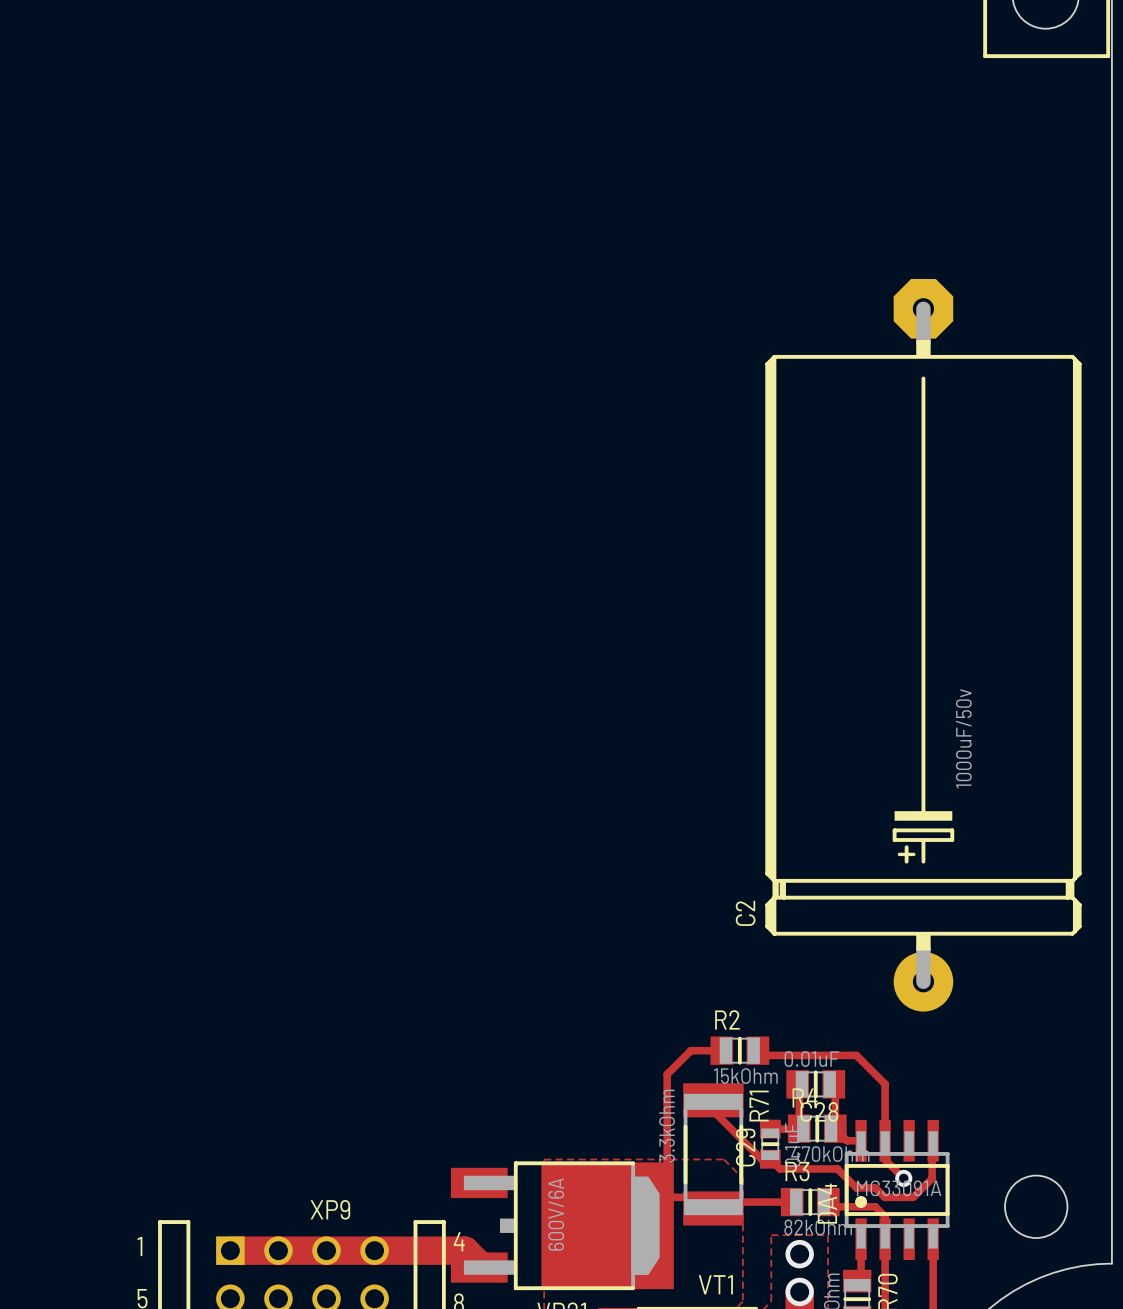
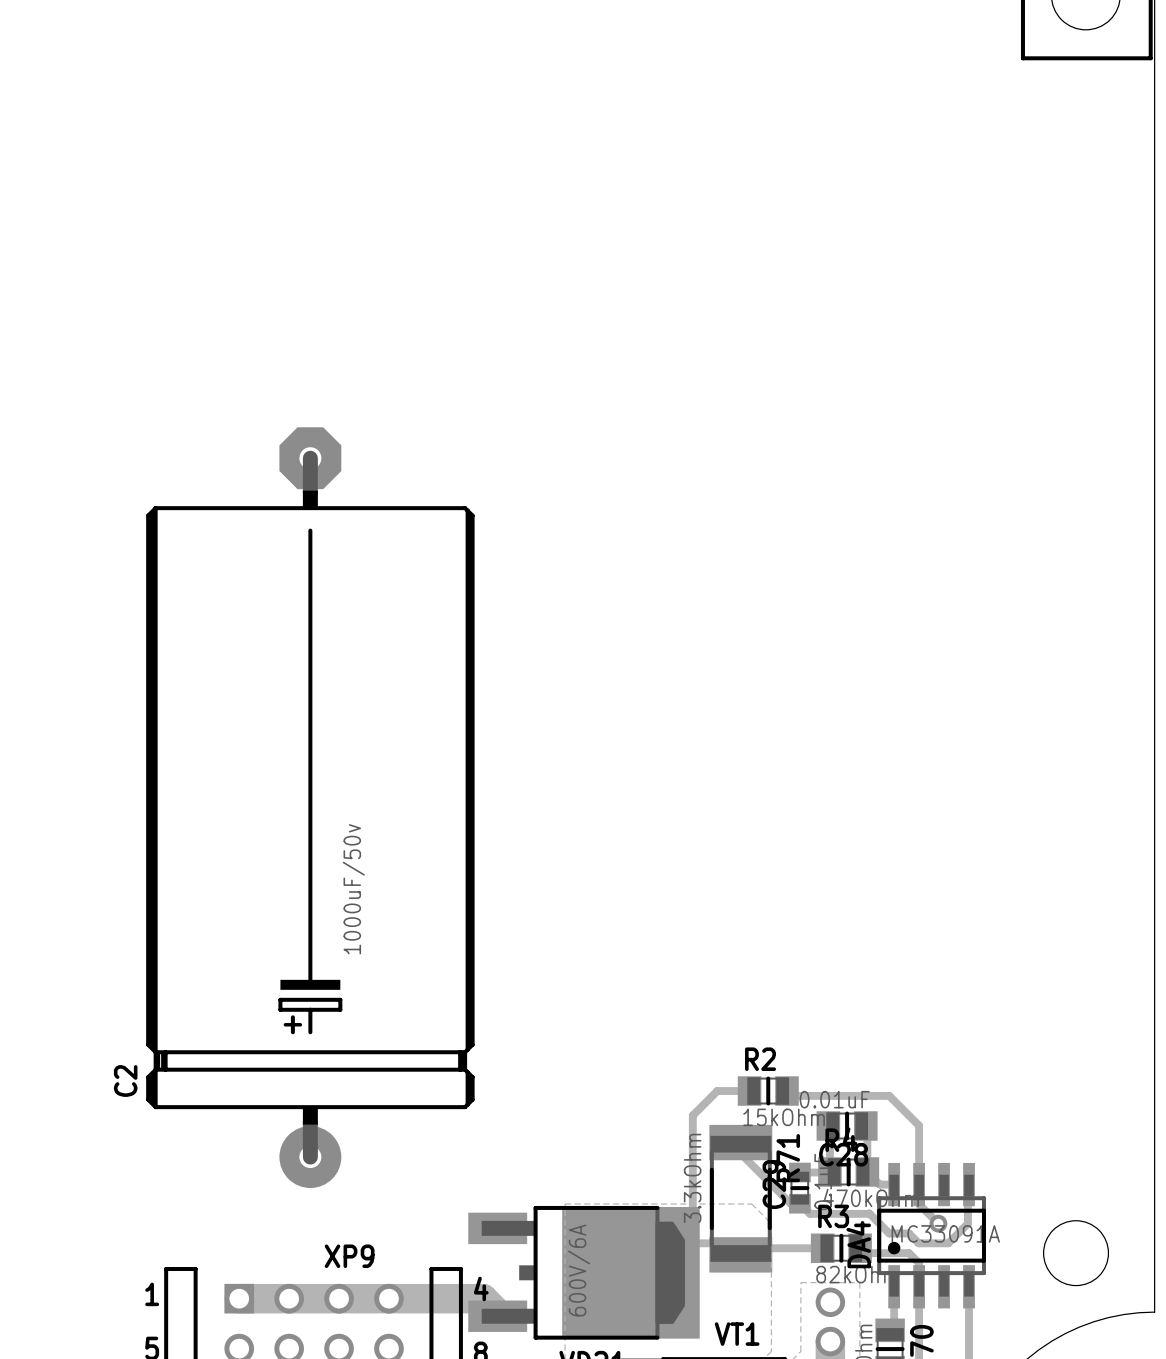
C2 position: (923, 645) -> (310, 807)

